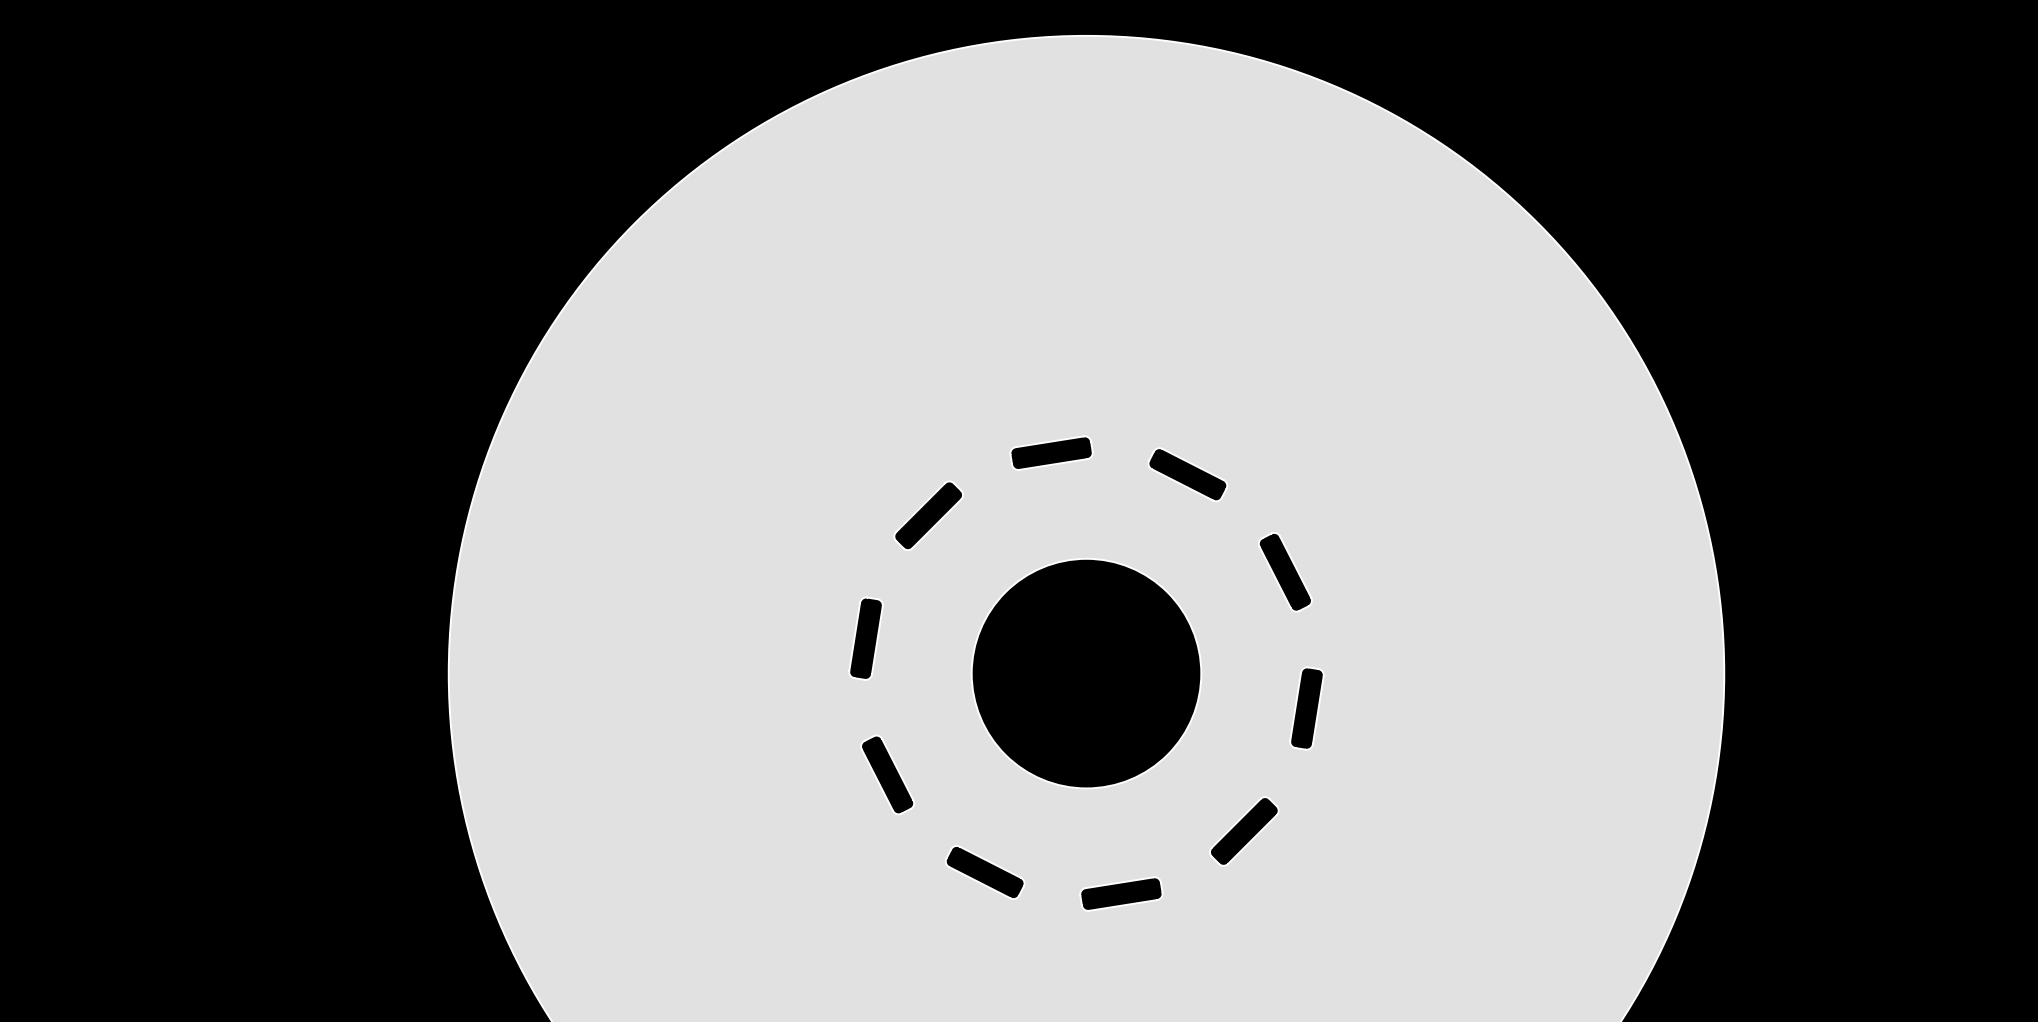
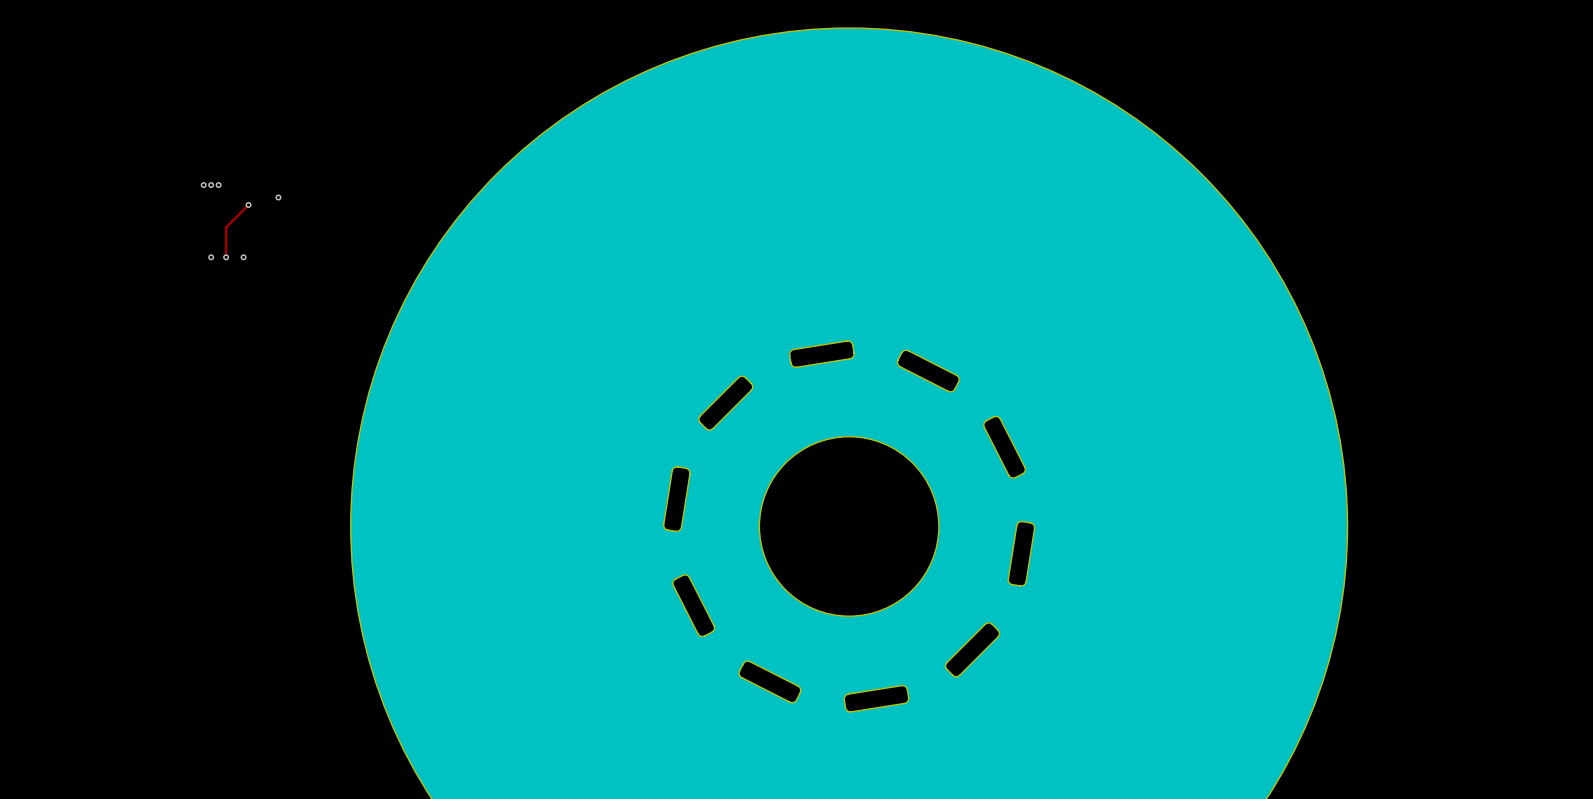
via: none -> (203, 185)
via: none -> (211, 185)
via: none -> (218, 185)
via: none -> (278, 197)
track: none -> (248, 204) (226, 227) (226, 257)
via: none -> (248, 204)
via: none -> (211, 257)
via: none -> (226, 257)
via: none -> (243, 257)

